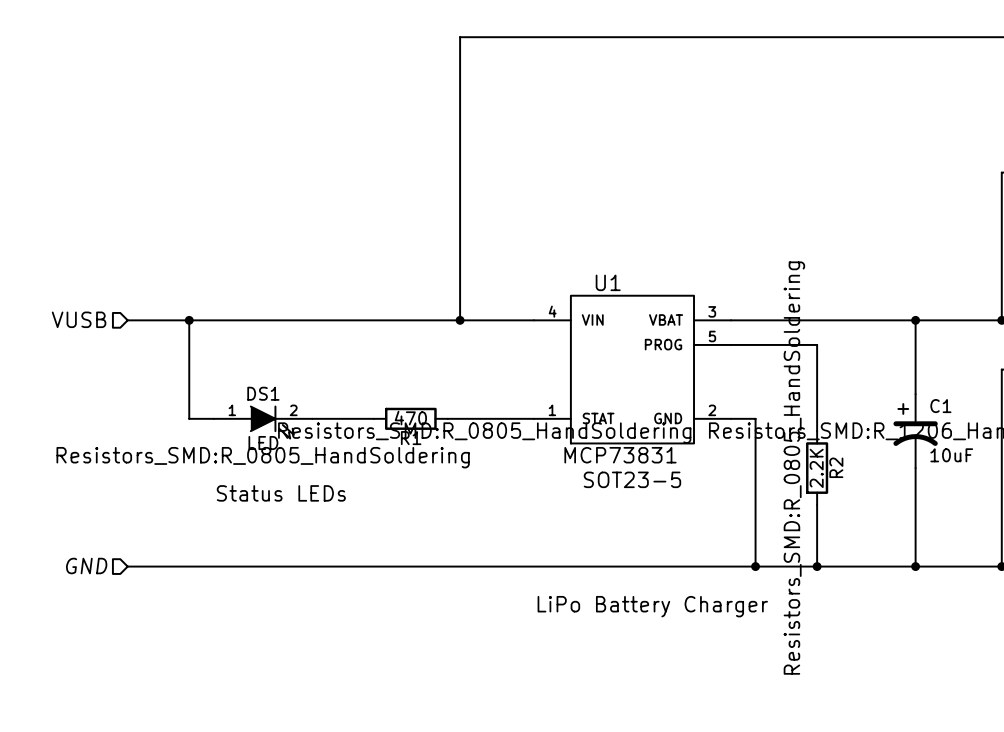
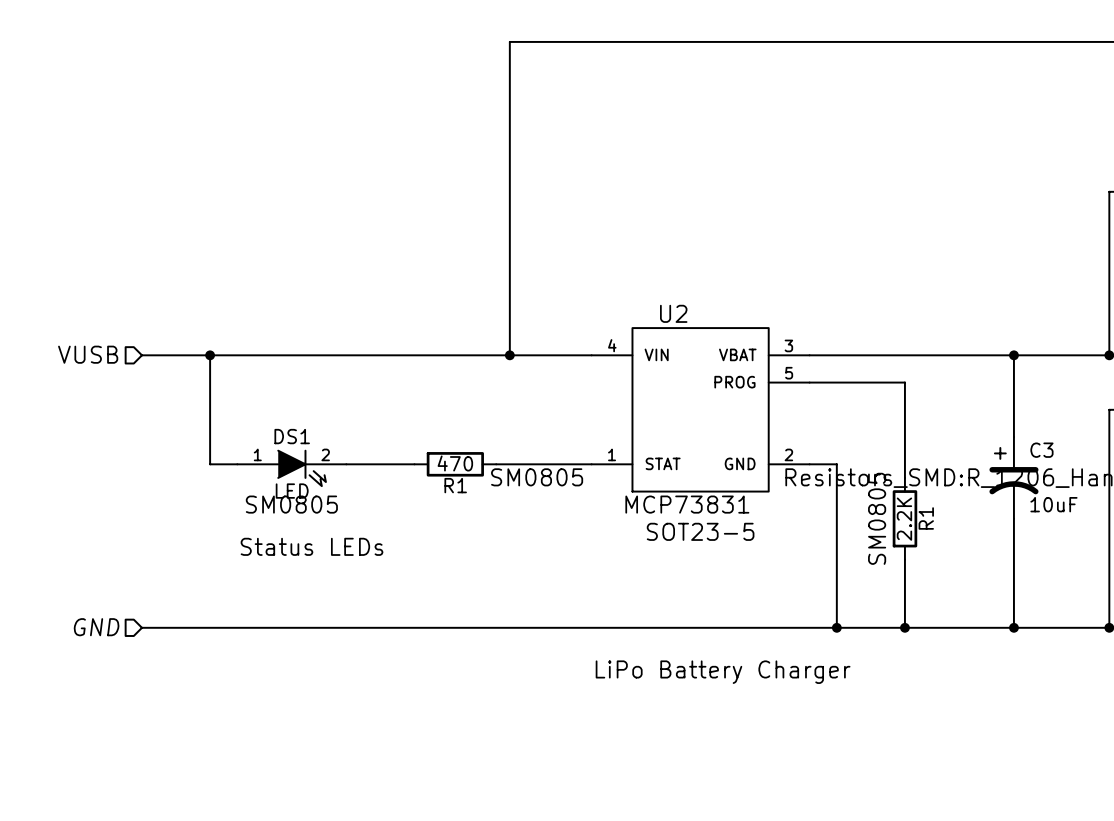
U1 name: U1 (608, 282) -> U2 (673, 313)
C1 name: C1 (940, 406) -> C3 (1041, 450)
R1 text: Resistors_SMD:R_0805_HandSoldering (484, 433) -> SM0805 (537, 477)
DS1 text: Resistors_SMD:R_0805_HandSoldering (263, 457) -> SM0805 (291, 504)
R2 name: R2 (836, 467) -> R1 (926, 518)
R2 text: Resistors_SMD:R_0805_HandSoldering (794, 468) -> SM0805 (877, 518)

